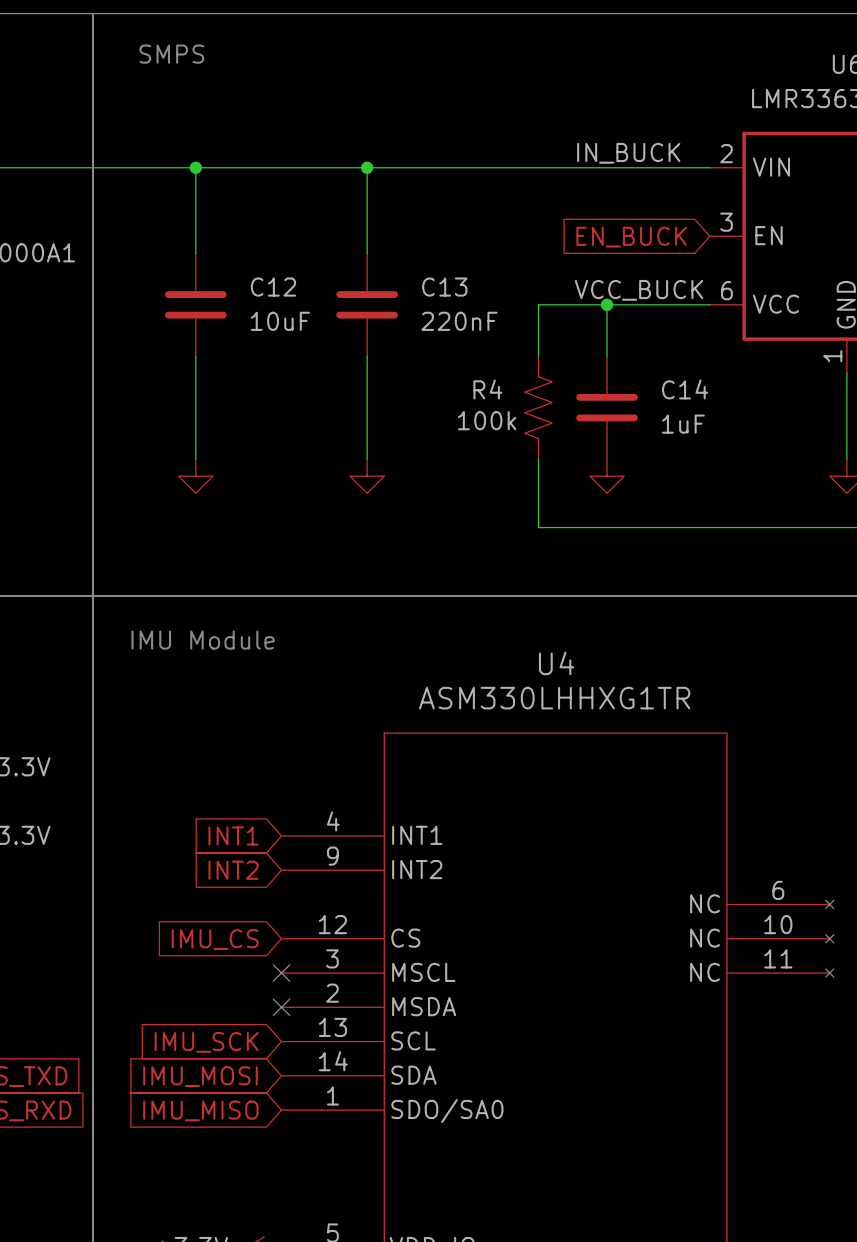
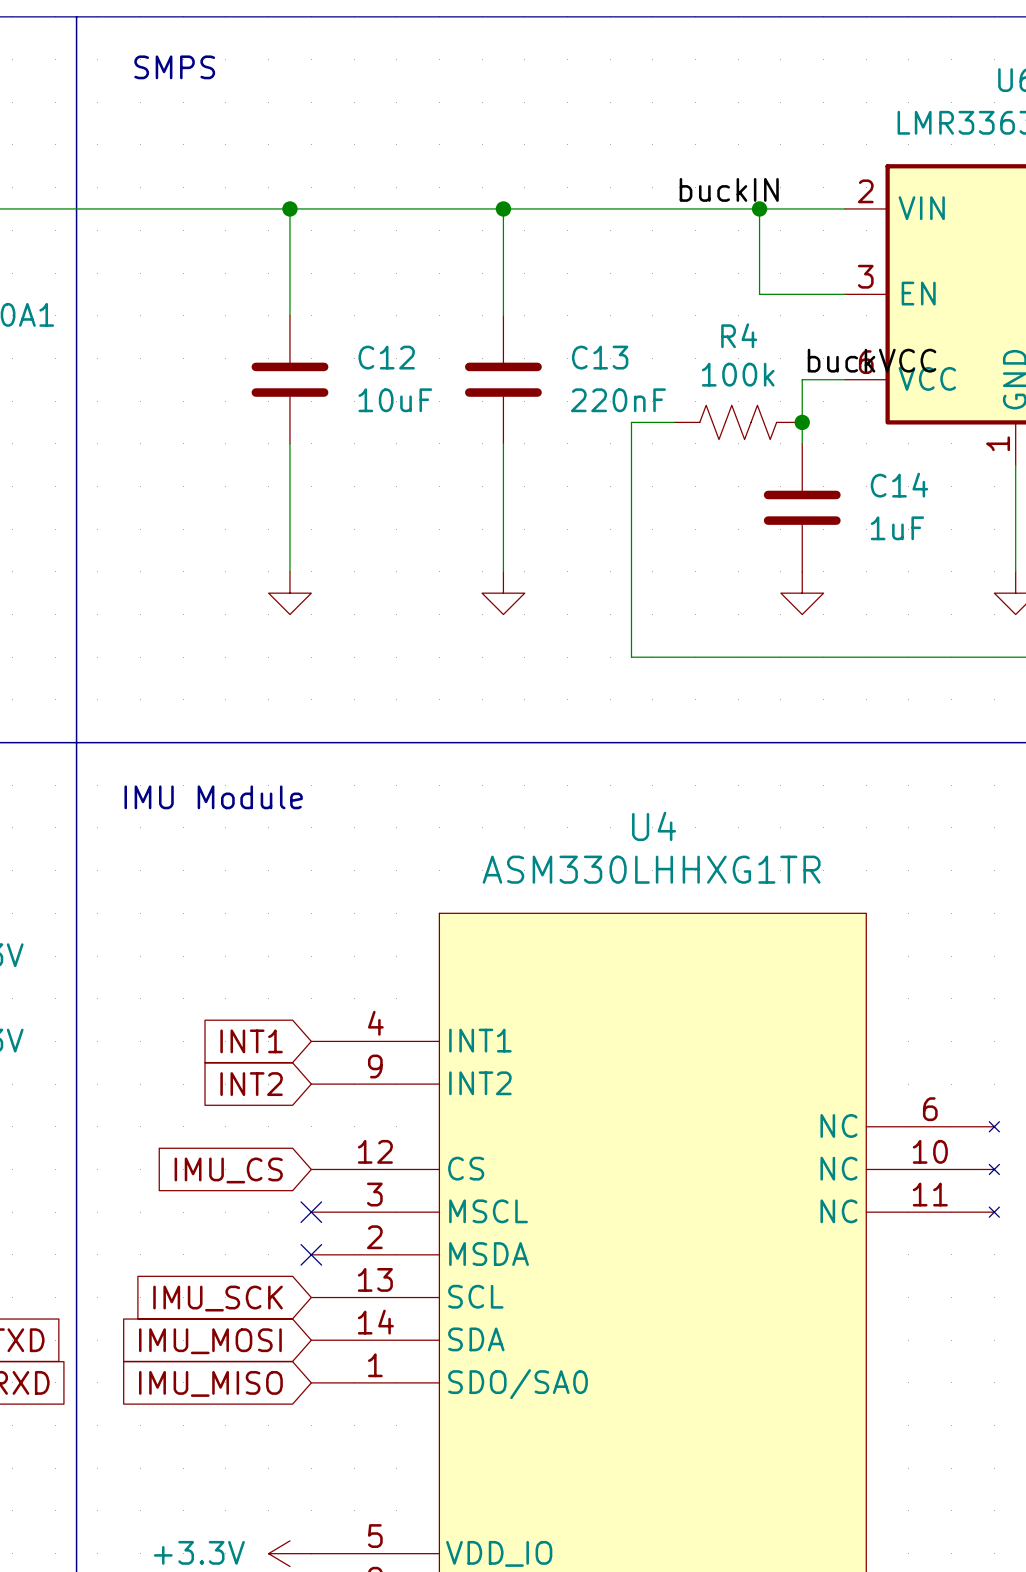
label: IN_BUCK (628, 153) -> buckIN (729, 189)
wire: (195, 167) (195, 253) -> (289, 208) (289, 315)
junction: (195, 167) -> none
junction: none -> (289, 208)
wire: (367, 167) (367, 253) -> (503, 208) (503, 315)
junction: (367, 167) -> none
junction: none -> (503, 208)
wire: none -> (759, 208) (759, 294) (844, 294)
junction: none -> (759, 208)
global label: EN_BUCK (631, 237) -> none
label: none -> buckVCC (872, 360)
label: VCC_BUCK (638, 290) -> none
C12 position: (195, 304) -> (289, 379)
C13 position: (367, 304) -> (503, 379)
wire: (607, 304) (607, 356) -> (802, 379) (802, 443)
junction: (607, 304) -> none
wire: (675, 304) (538, 304) (538, 339) -> (674, 422) (631, 422)
junction: none -> (802, 422)
wire: (195, 356) (195, 459) -> (289, 443) (289, 571)
wire: (367, 356) (367, 459) -> (503, 443) (503, 571)
wire: none -> (631, 443) (631, 571)
R4 rotation: 0° (538, 407) -> 90° clockwise (738, 422)
R4 position: (538, 407) -> (738, 422)
C14 position: (607, 407) -> (802, 507)
power symbol: (195, 476) -> none
power symbol: none -> (289, 593)
power symbol: (367, 476) -> none
power symbol: none -> (503, 593)
power symbol position: (607, 476) -> (802, 593)

